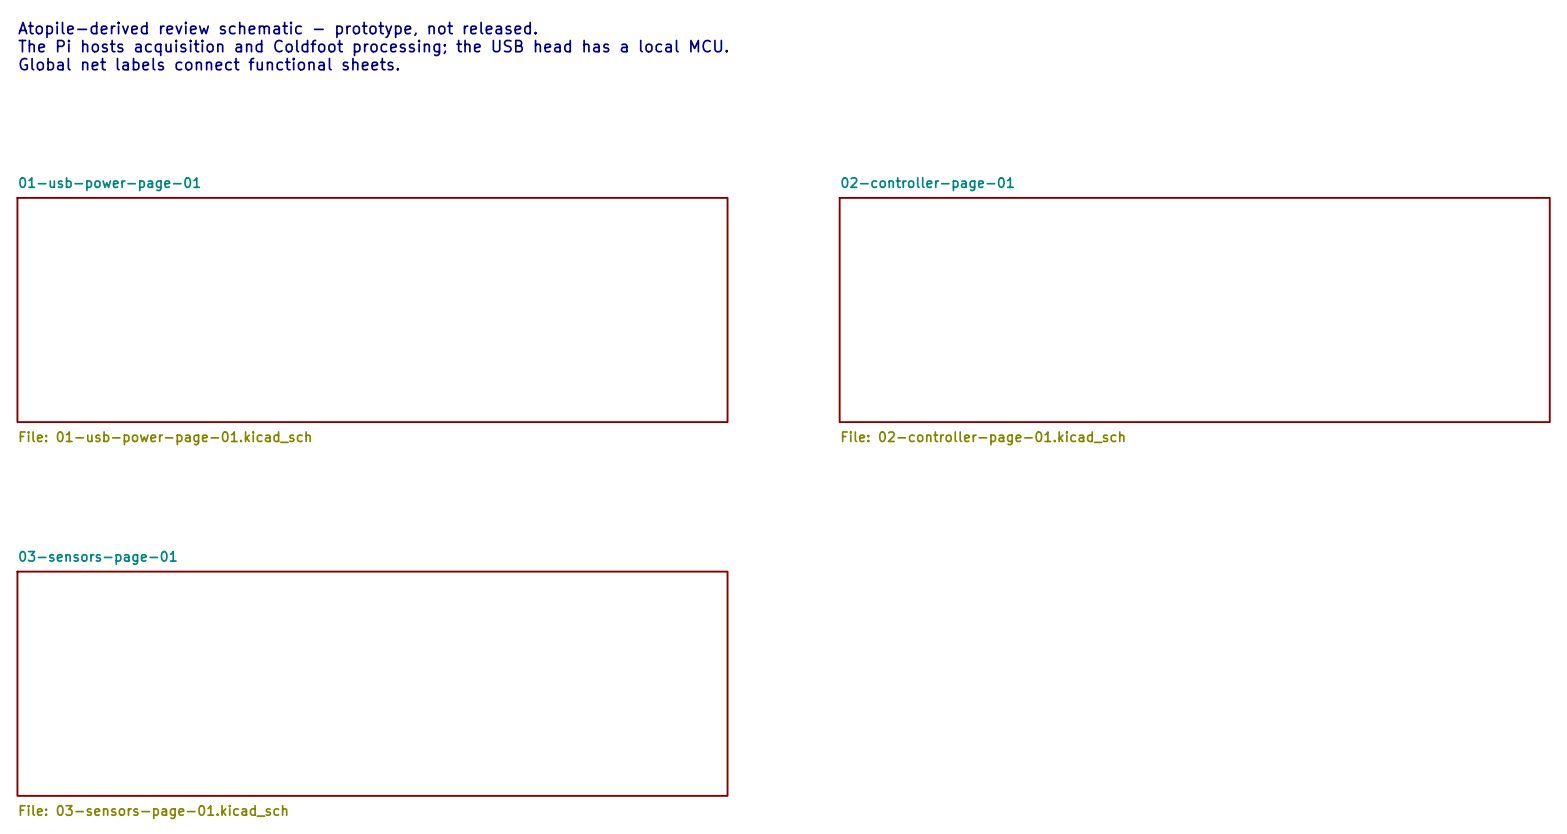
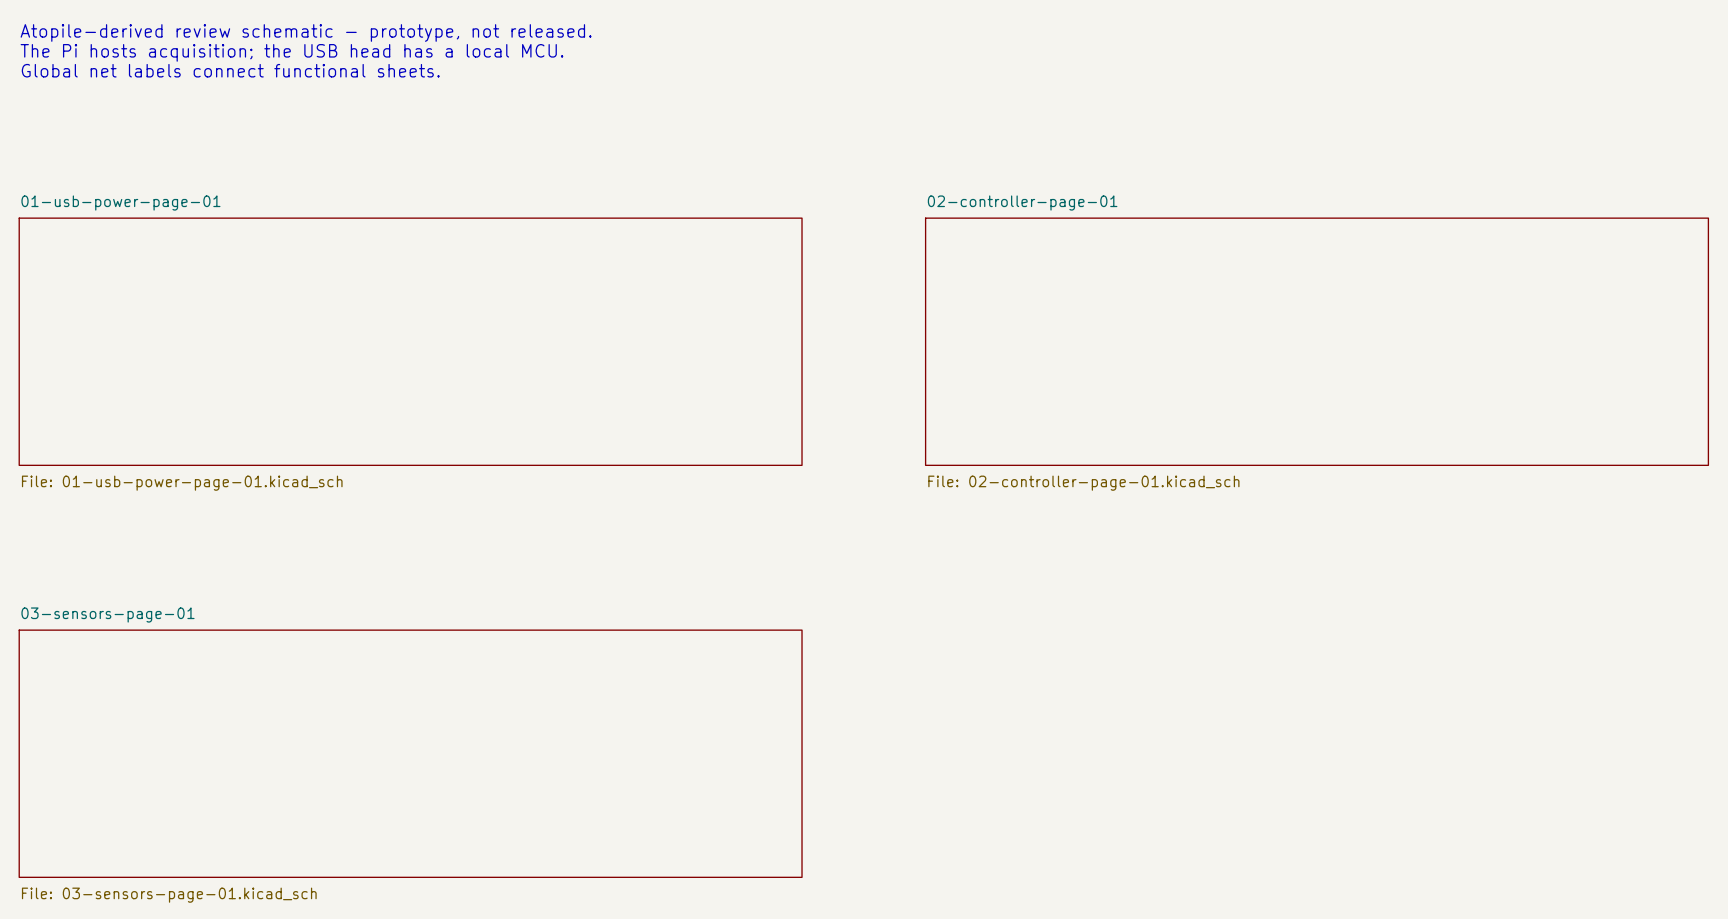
text: The Pi hosts acquisition and Coldfoot processing; the USB head has a local MCU. (373, 47) -> The Pi hosts acquisition; the USB head has a local MCU. (291, 52)

